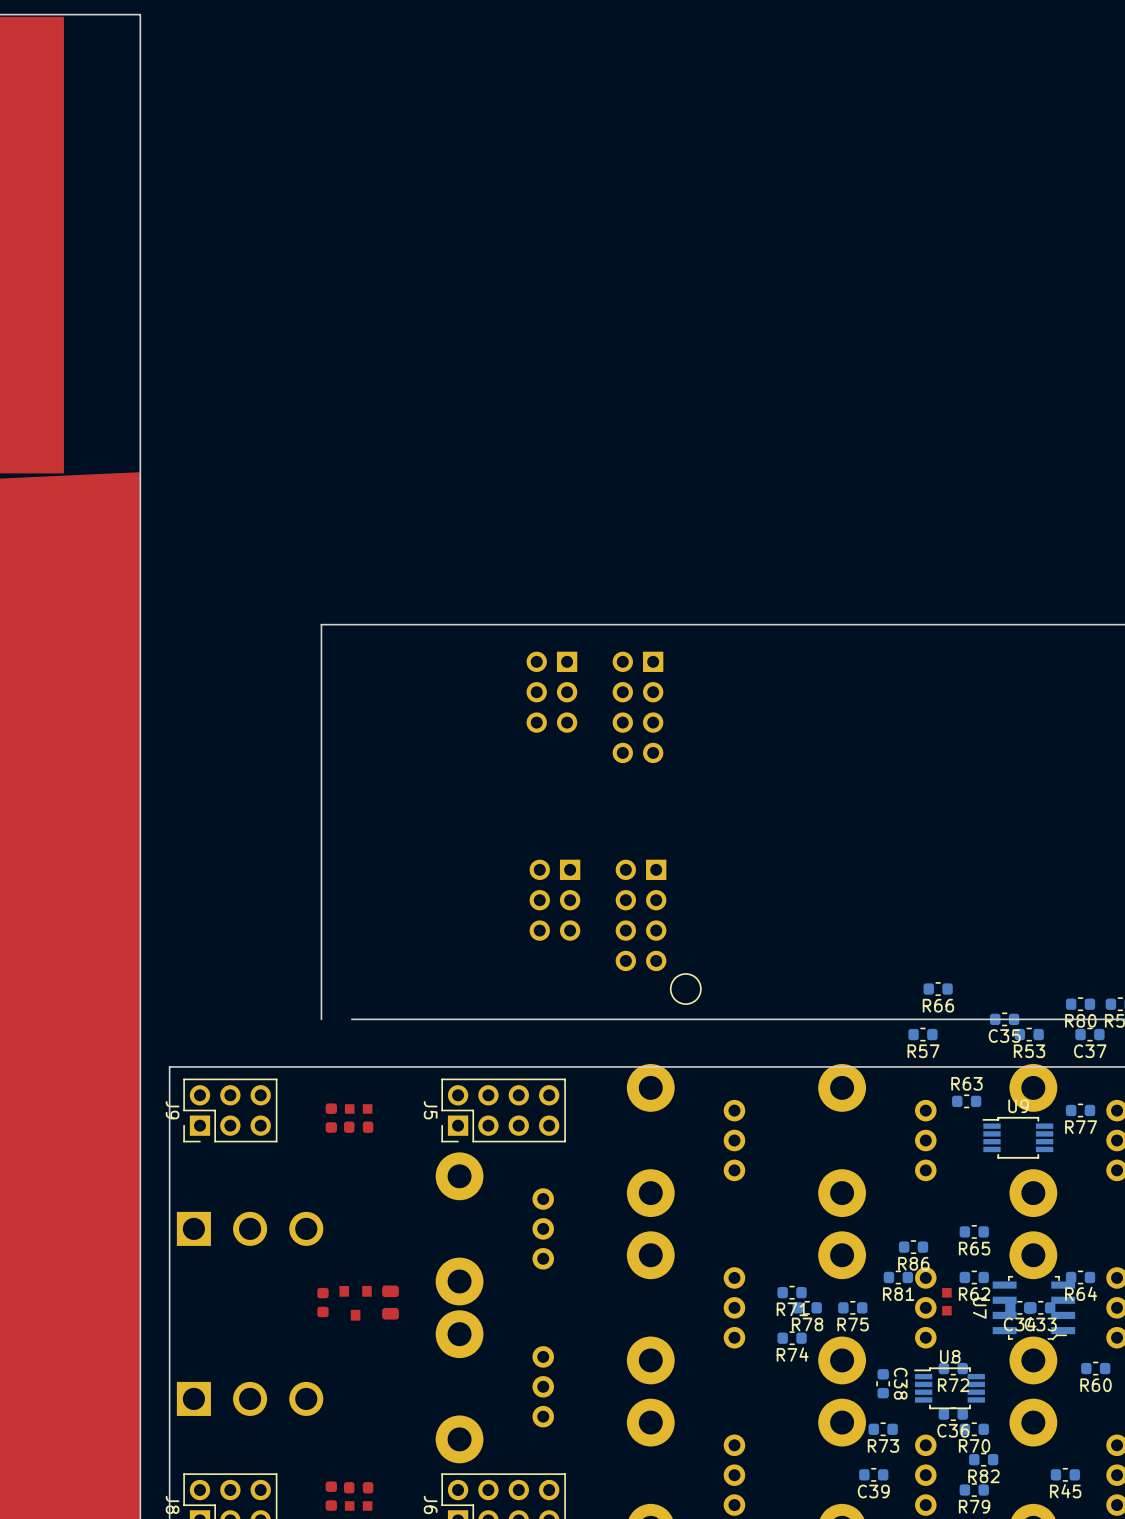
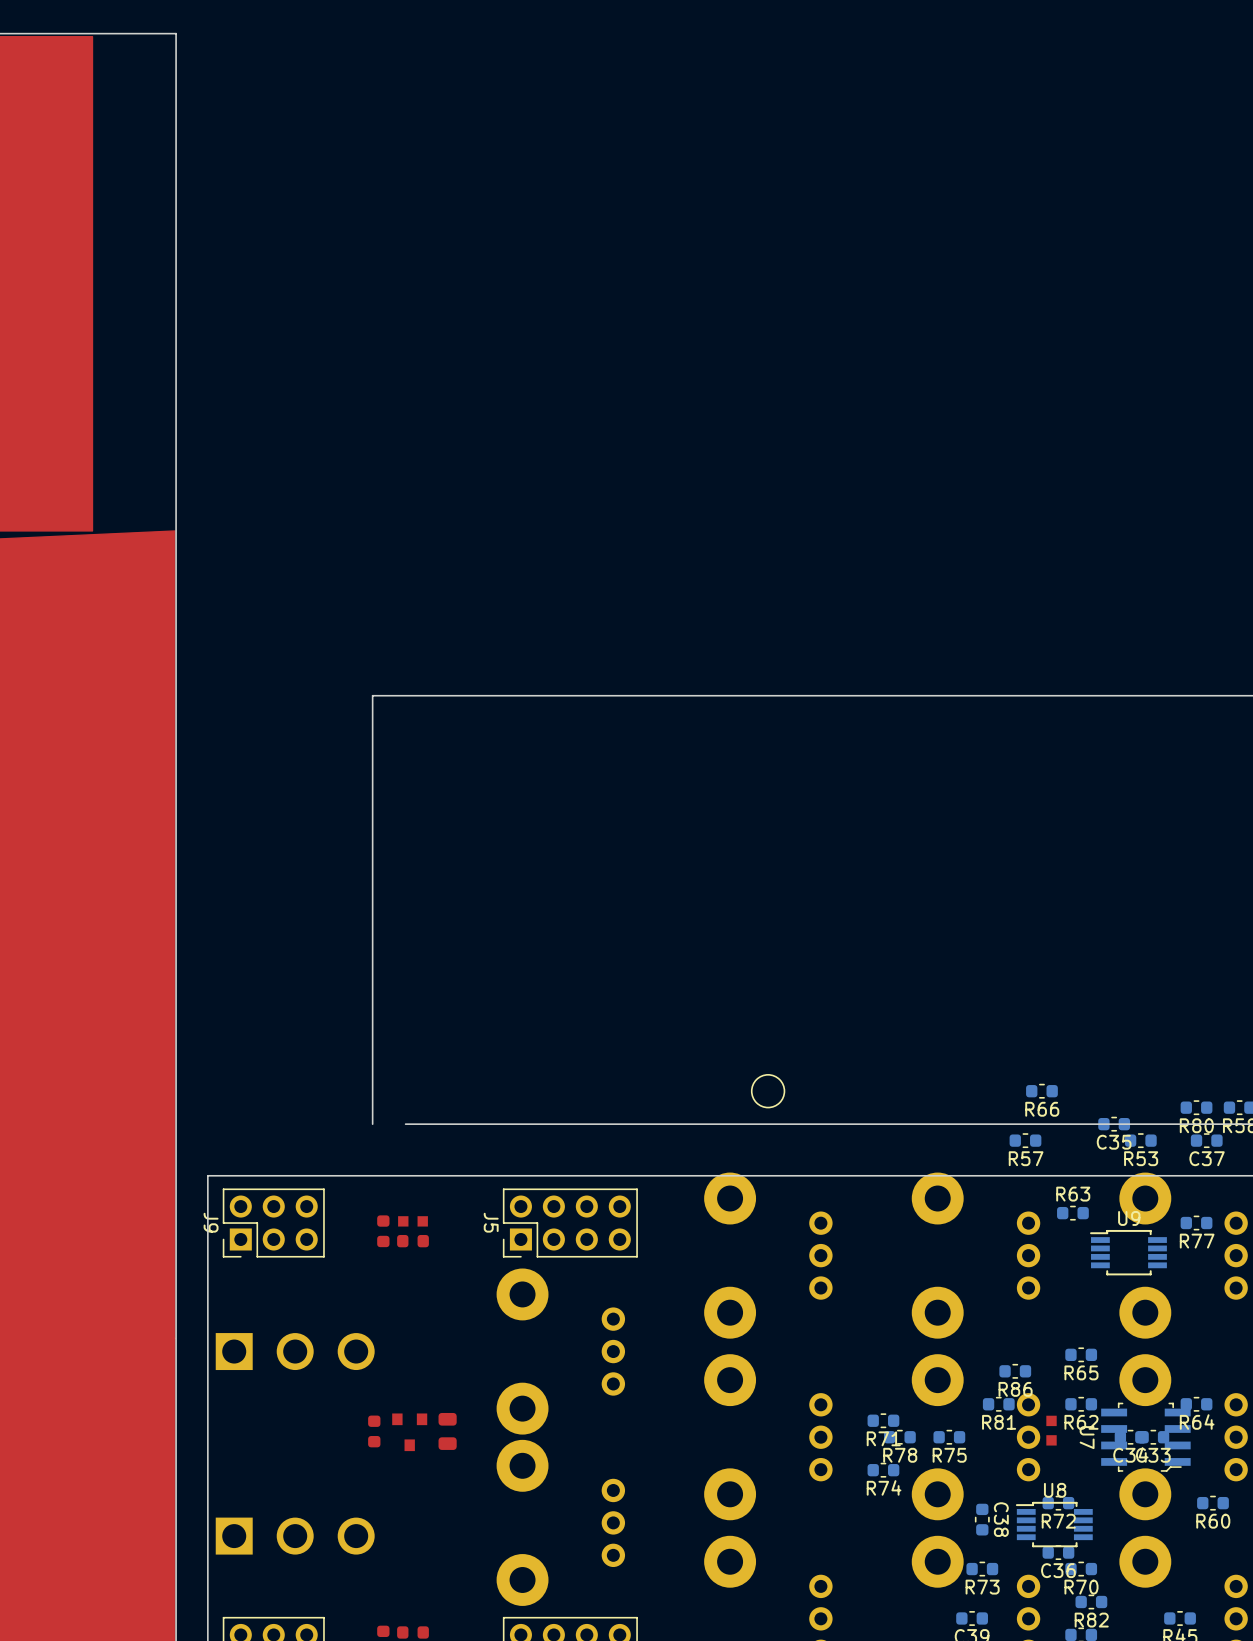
part: (551, 692) -> none
part: (637, 707) -> none
part: (554, 900) -> none
part: (641, 915) -> none

